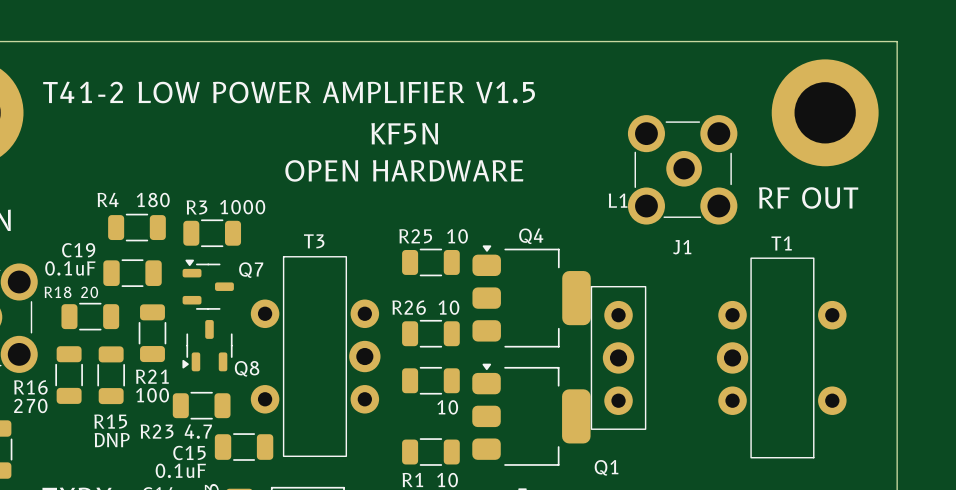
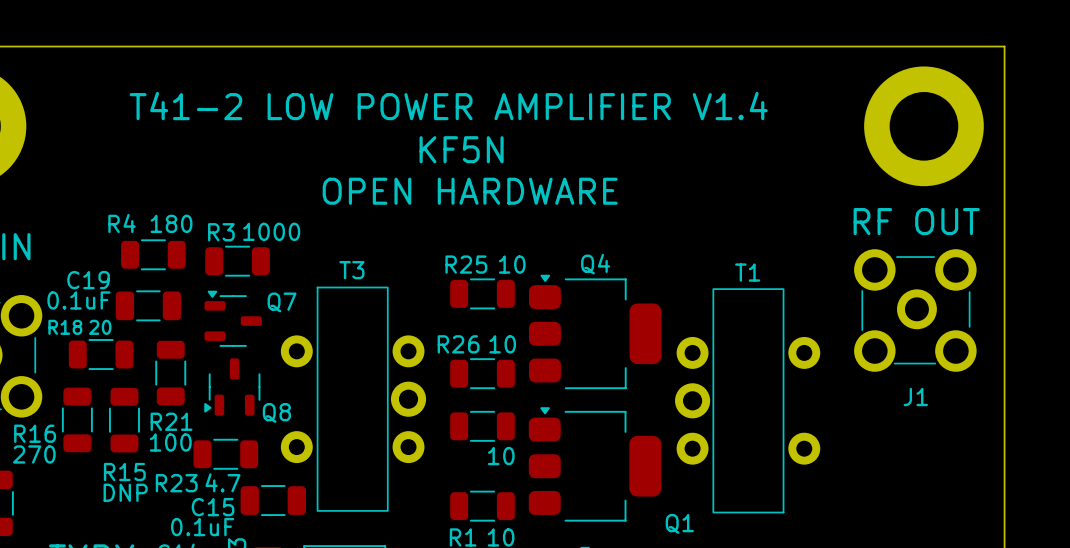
text: T41-2 LOW POWER AMPLIFIER V1.5 (289, 92) -> T41-2 LOW POWER AMPLIFIER V1.4 (448, 106)
J1 position: (682, 169) -> (915, 310)
L1: (618, 357) -> none
T1 position: (781, 357) -> (747, 400)

